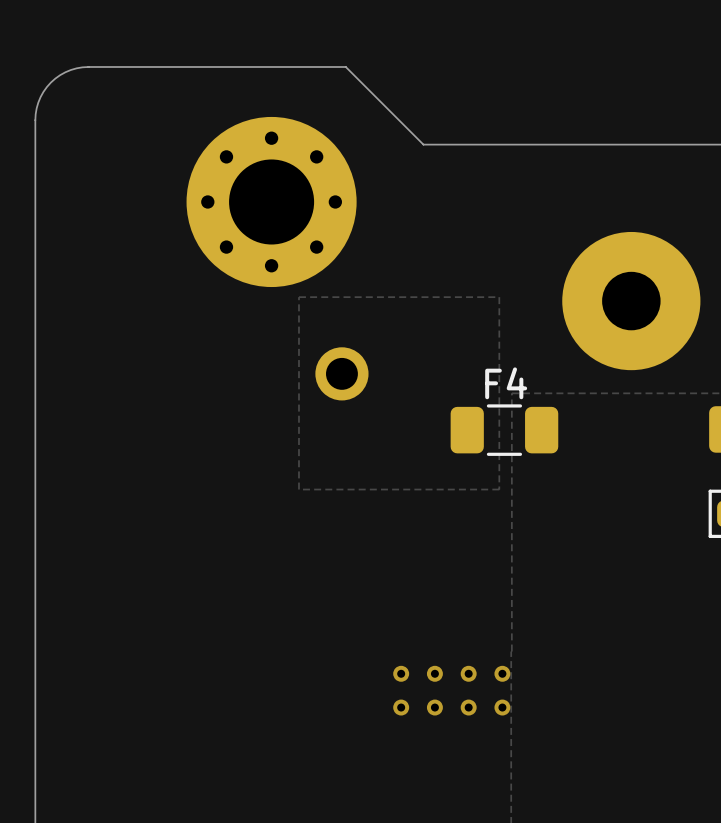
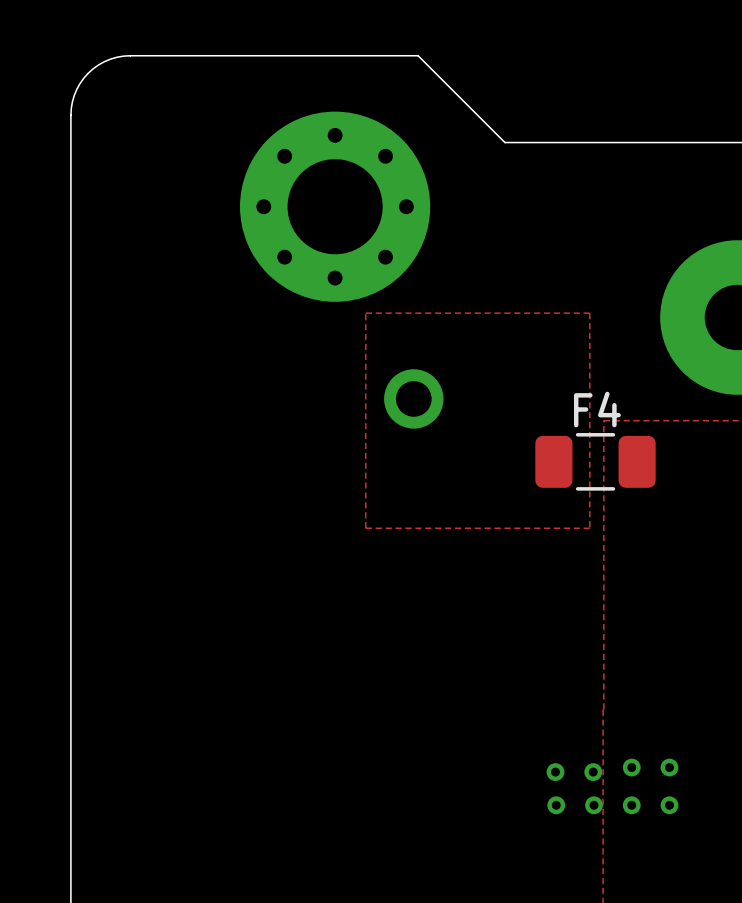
via: (401, 673) -> none
via: (434, 673) -> none
via: (468, 673) -> none
via: (502, 673) -> none
via: none -> (631, 767)
via: none -> (669, 767)
via: (401, 707) -> none
via: (434, 707) -> none
via: none -> (556, 805)
via: none -> (594, 805)
via: none -> (631, 805)
via: none -> (669, 805)

